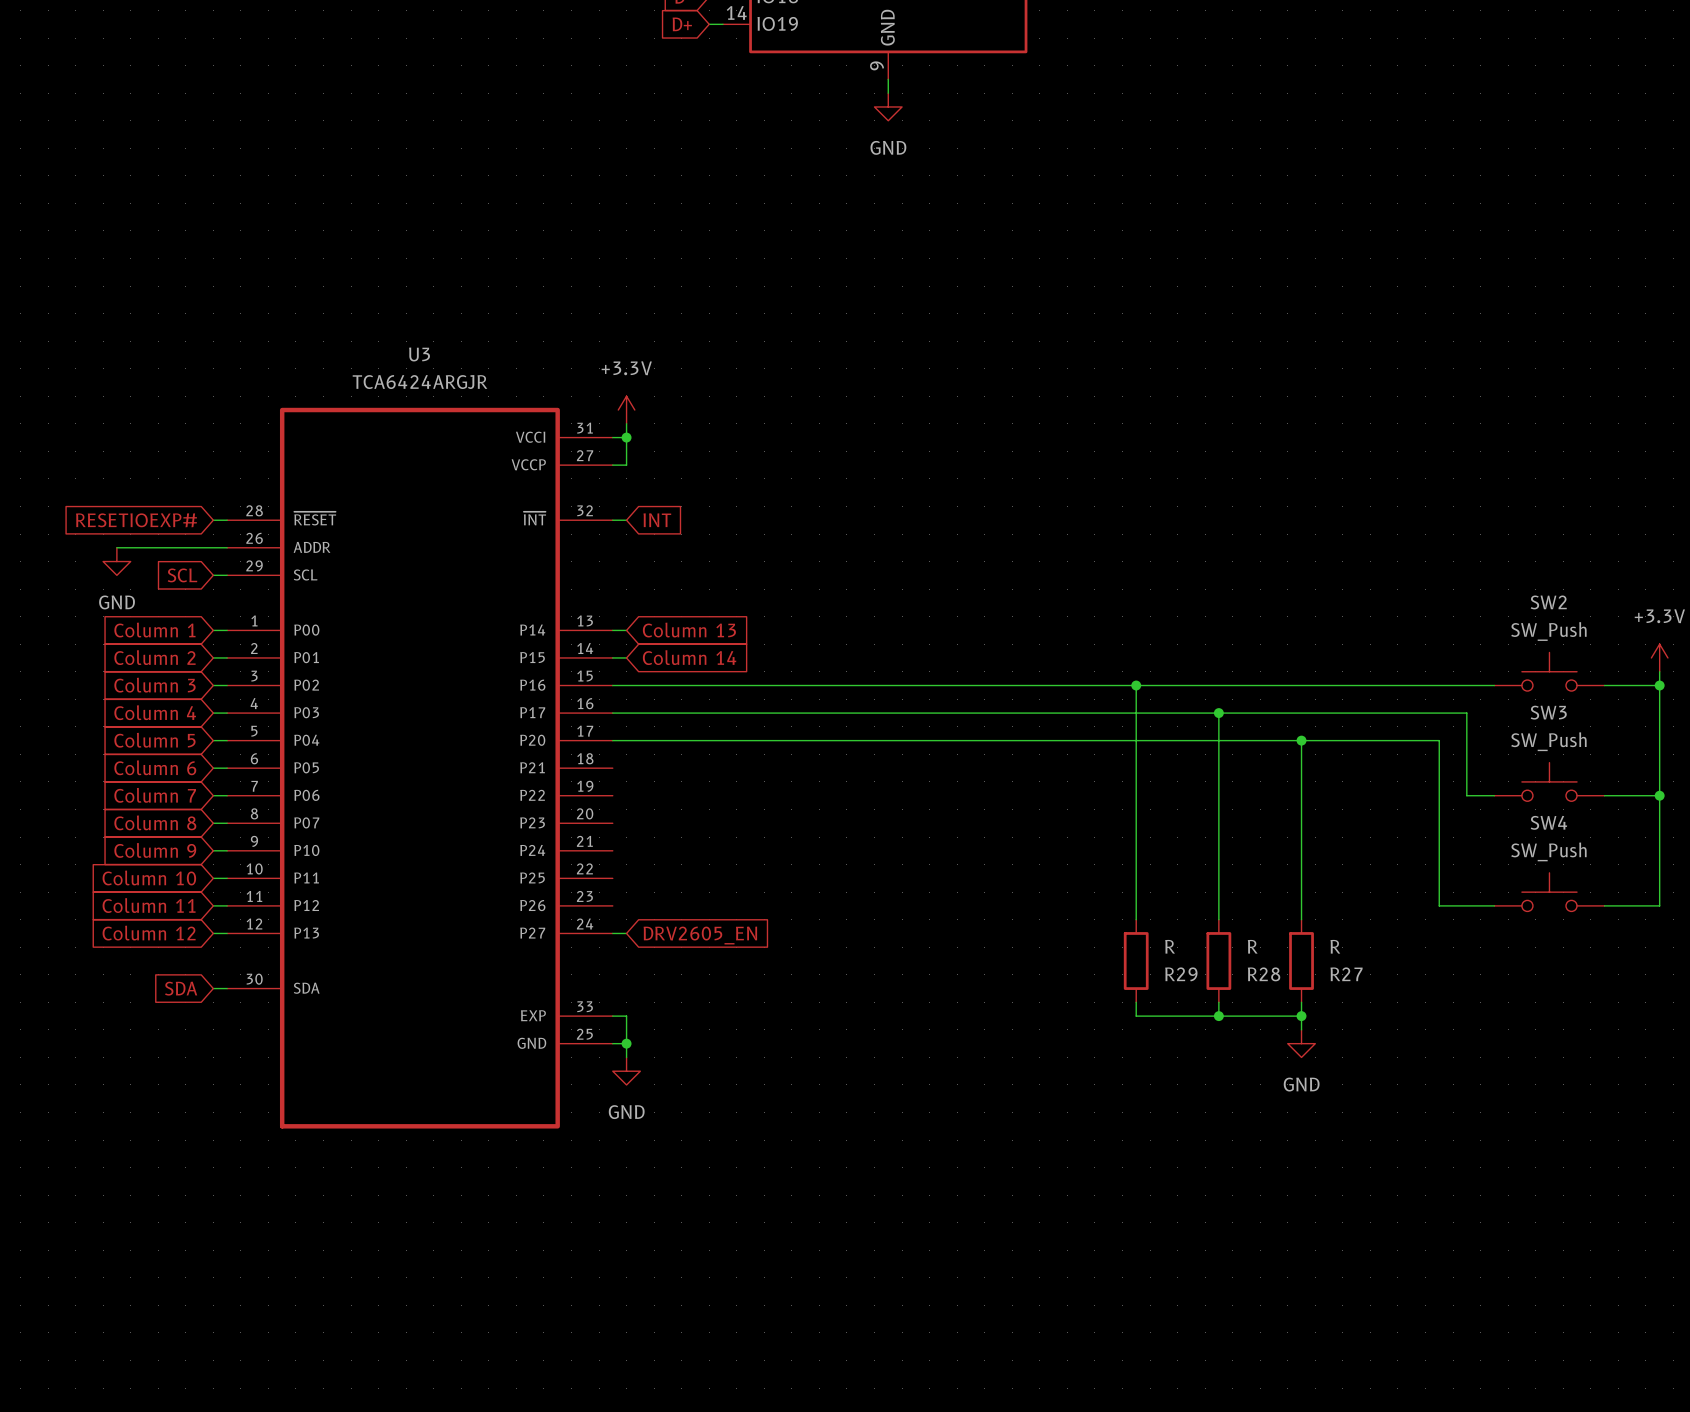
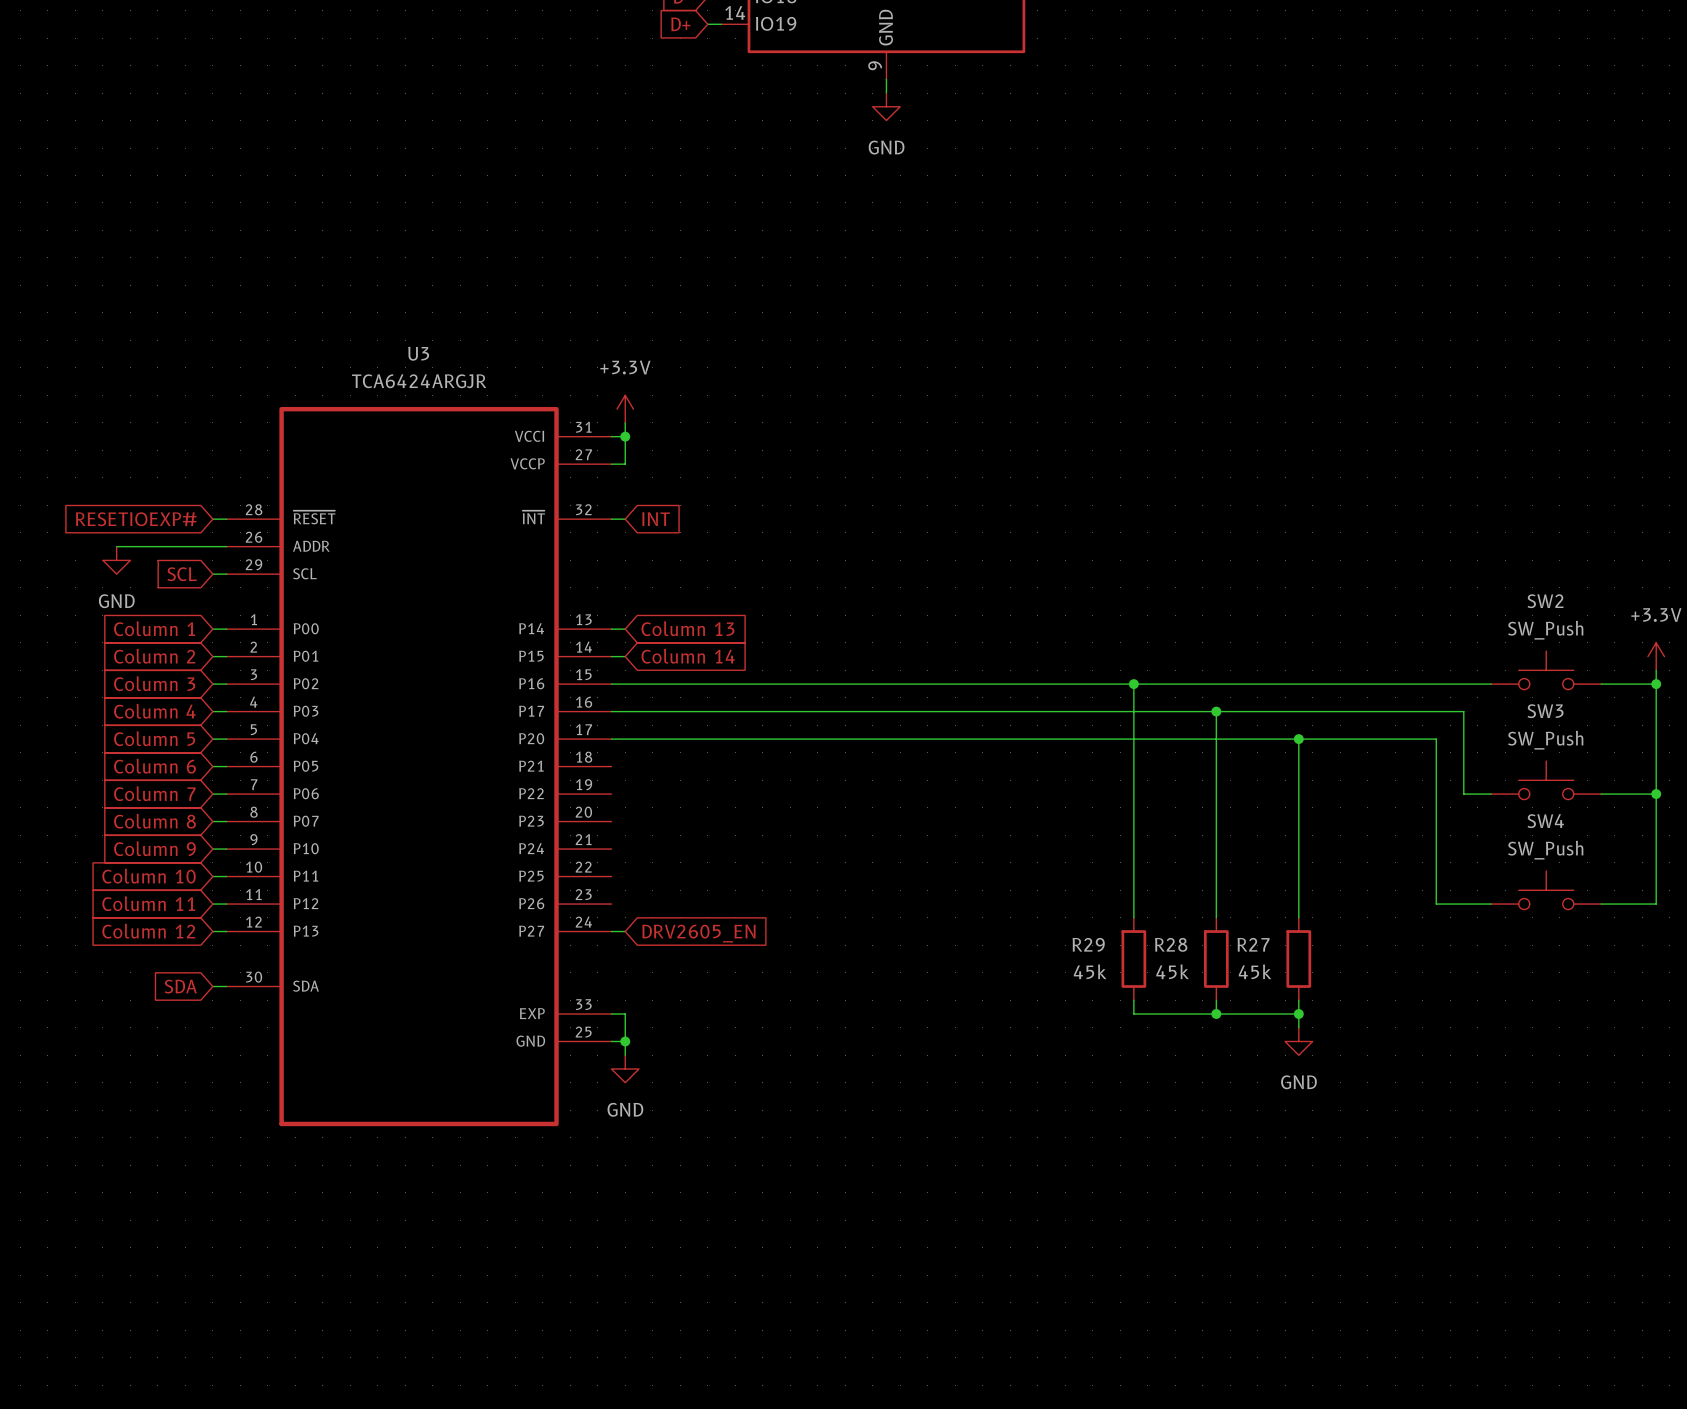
R29 value: R (1170, 946) -> 45k (1090, 971)
R28 value: R (1252, 946) -> 45k (1172, 971)
R27 value: R (1335, 946) -> 45k (1255, 971)
R29 name position: R29 (1181, 974) -> R29 (1088, 944)
R28 name position: R28 (1264, 974) -> R28 (1171, 944)
R27 name position: R27 (1346, 974) -> R27 (1253, 944)

